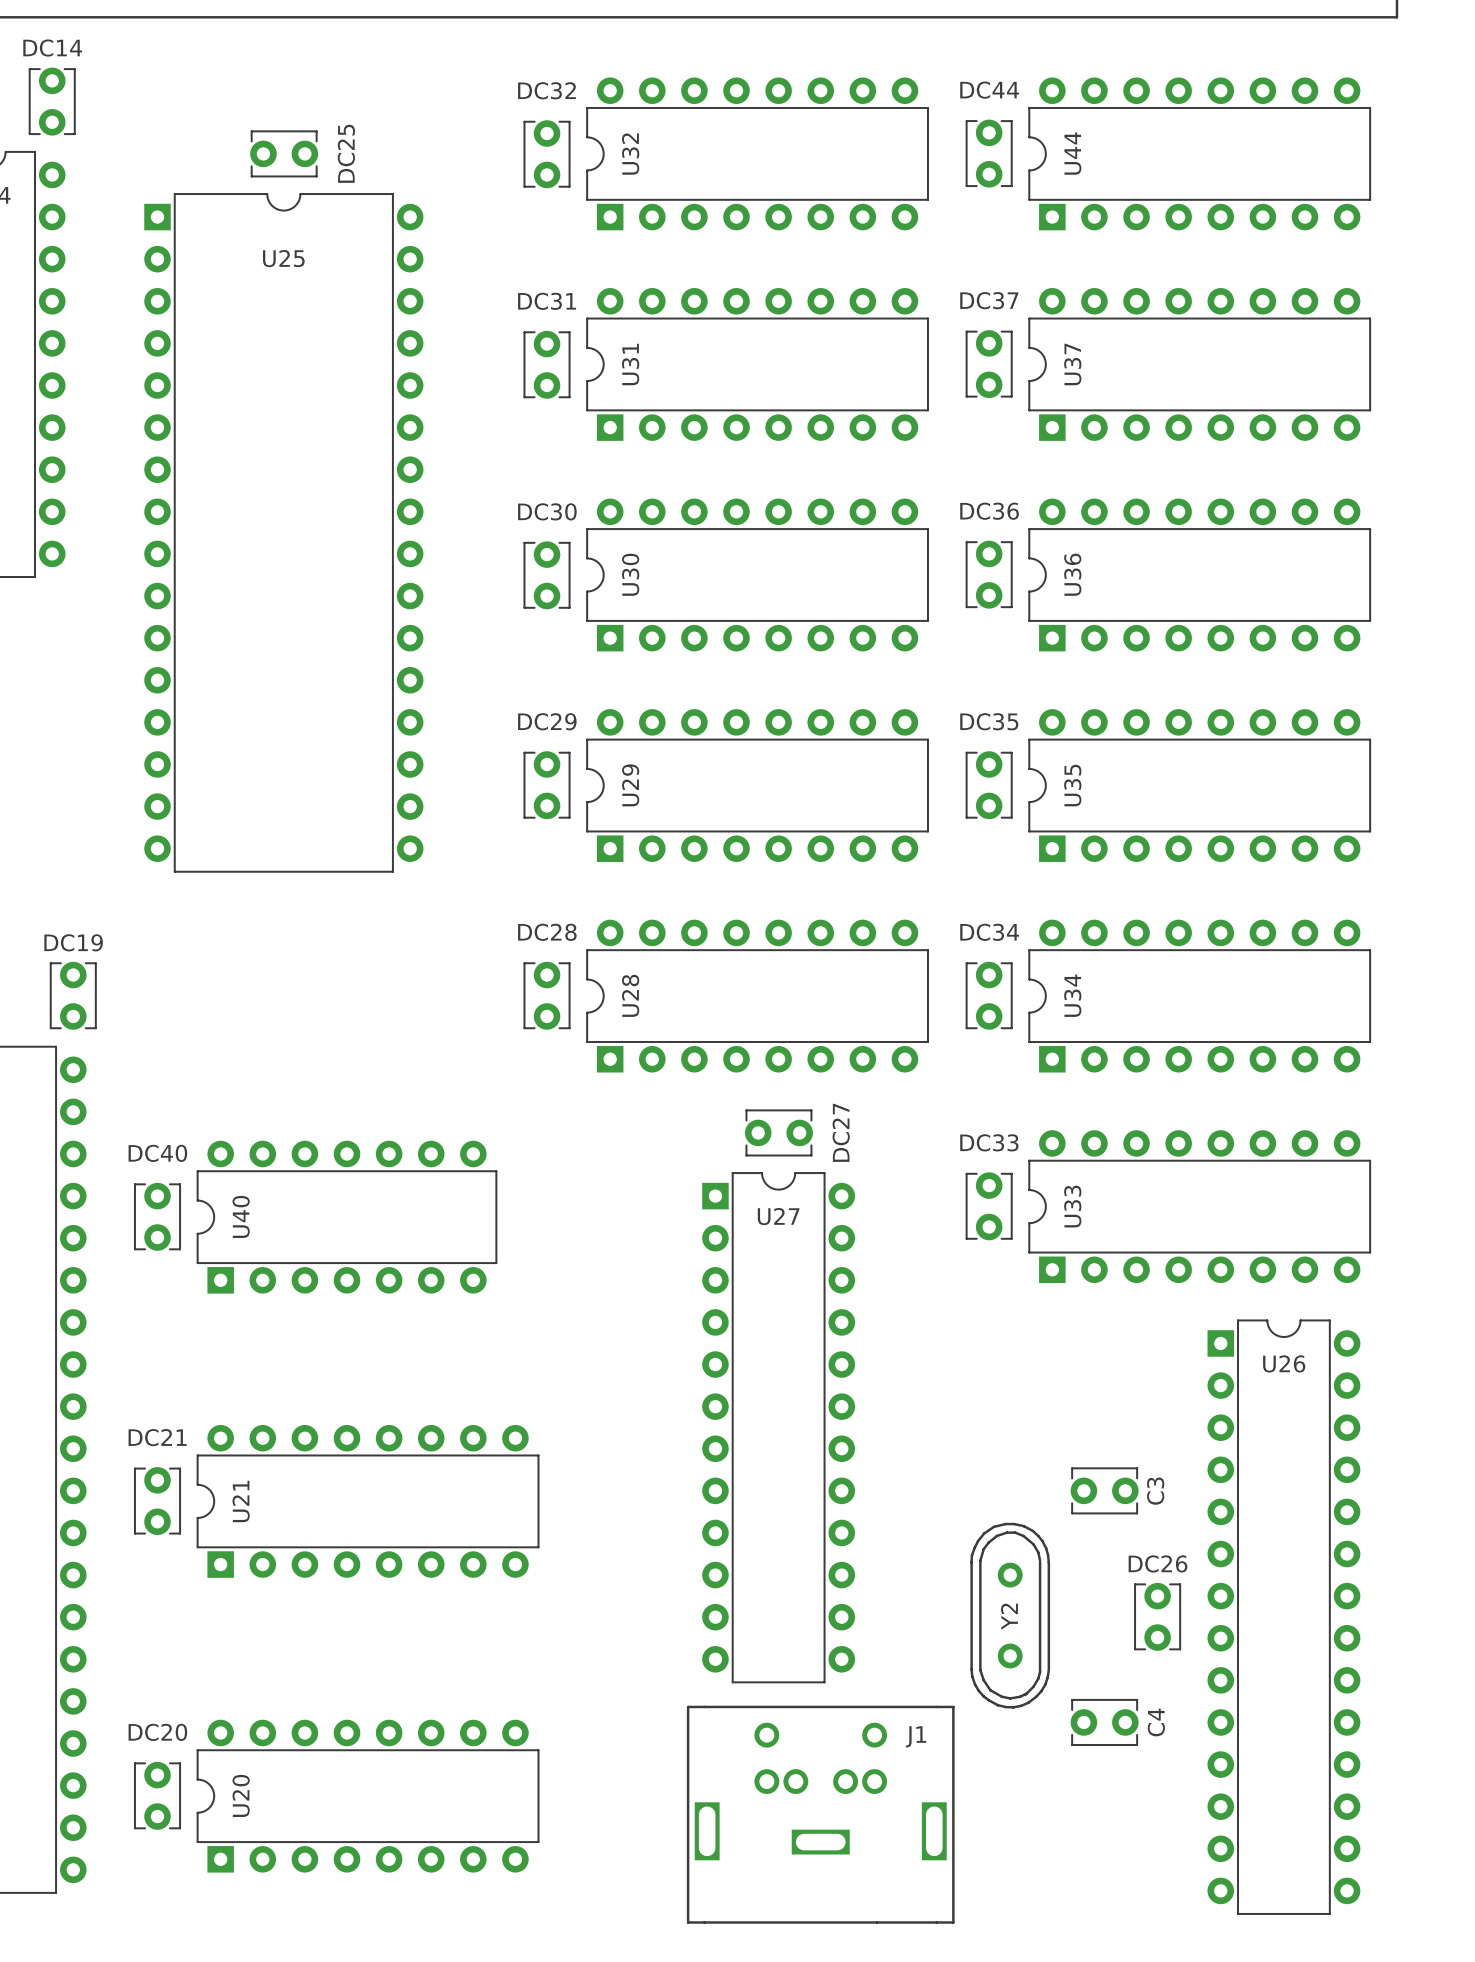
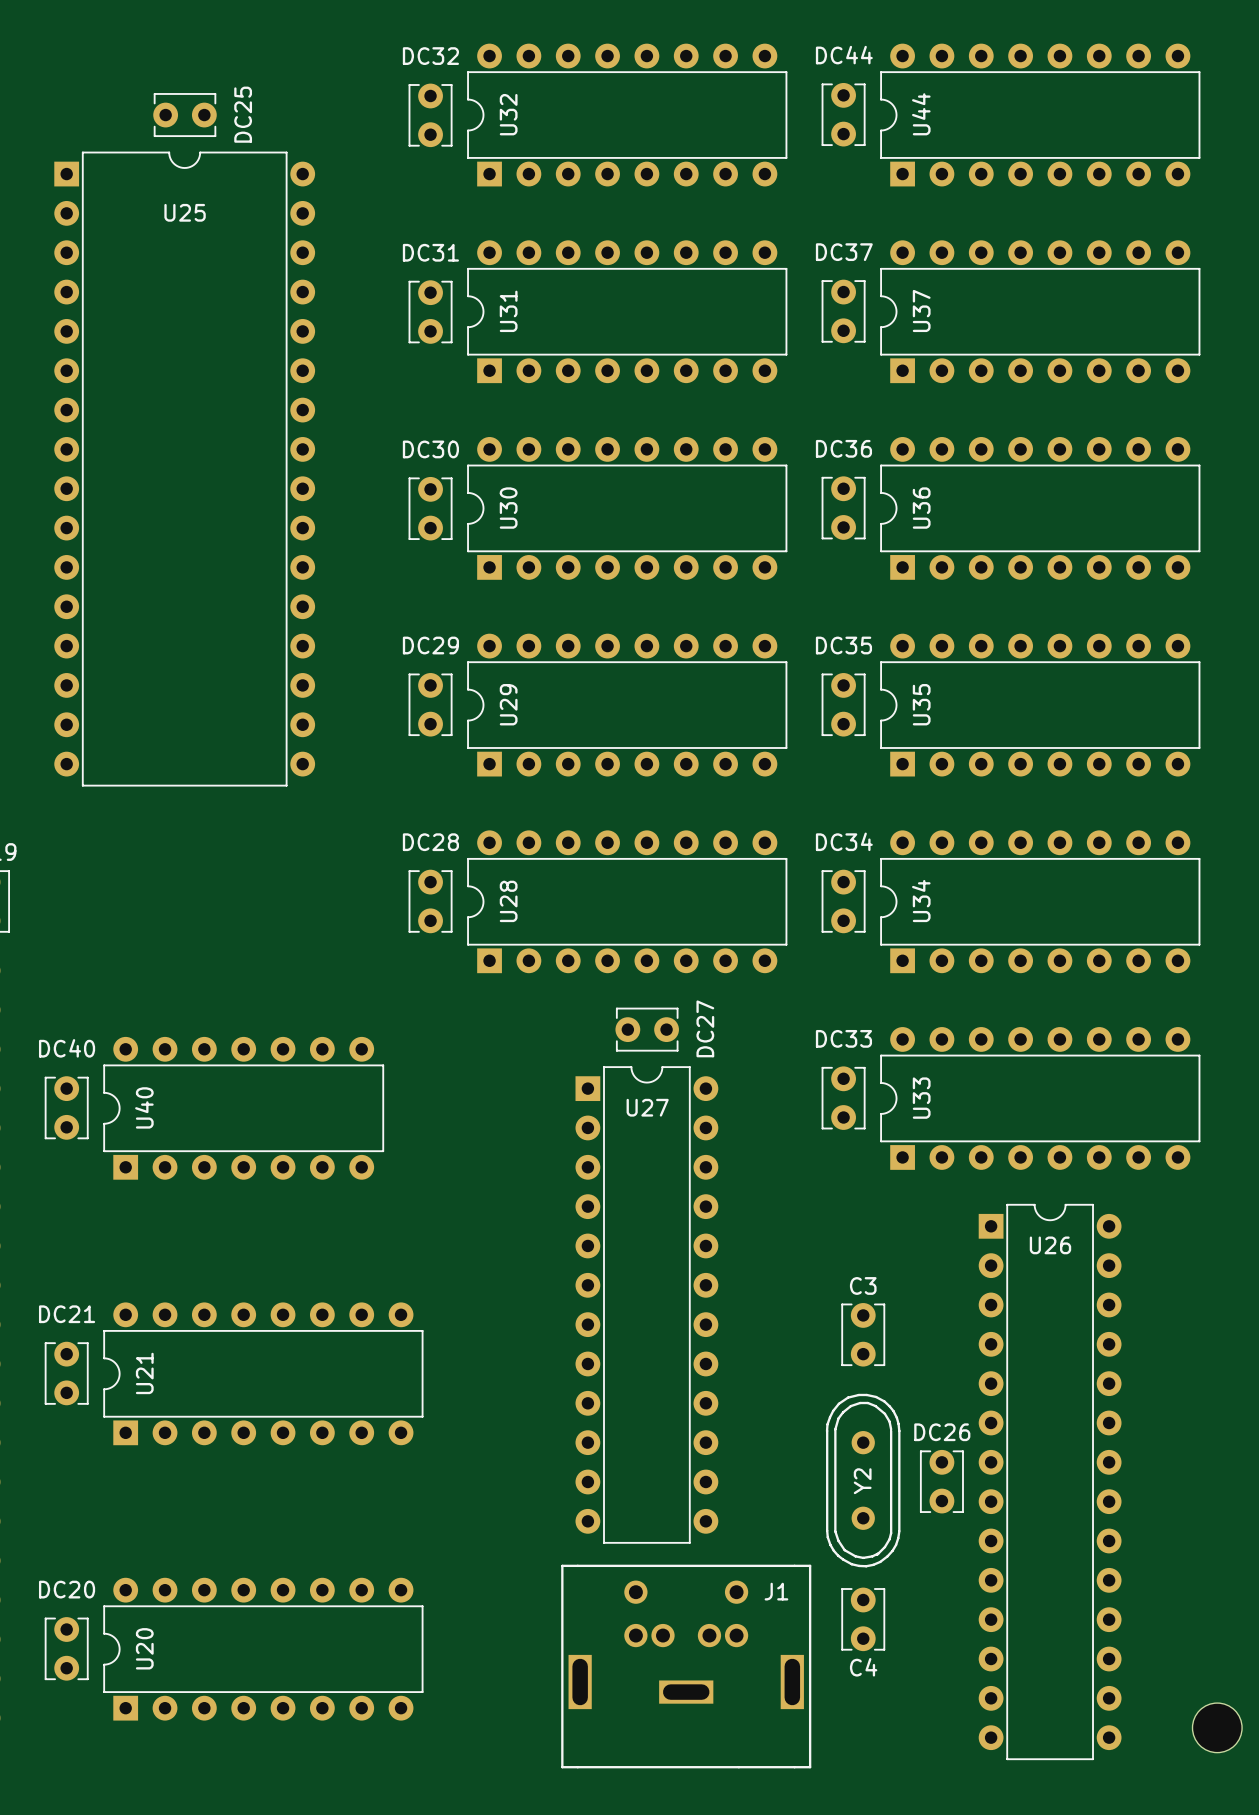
C3 rotation: 0° (1104, 1490) -> 90° clockwise (863, 1334)
C3 position: (1104, 1490) -> (863, 1334)
C3 name position: C3 (1155, 1491) -> C3 (863, 1285)
DC26 position: (1157, 1616) -> (941, 1481)
U26 position: (1283, 1617) -> (1050, 1481)
C4 rotation: 0° (1104, 1722) -> 90° clockwise (863, 1619)
C4 position: (1104, 1722) -> (863, 1619)
part: none -> (1217, 1727)

